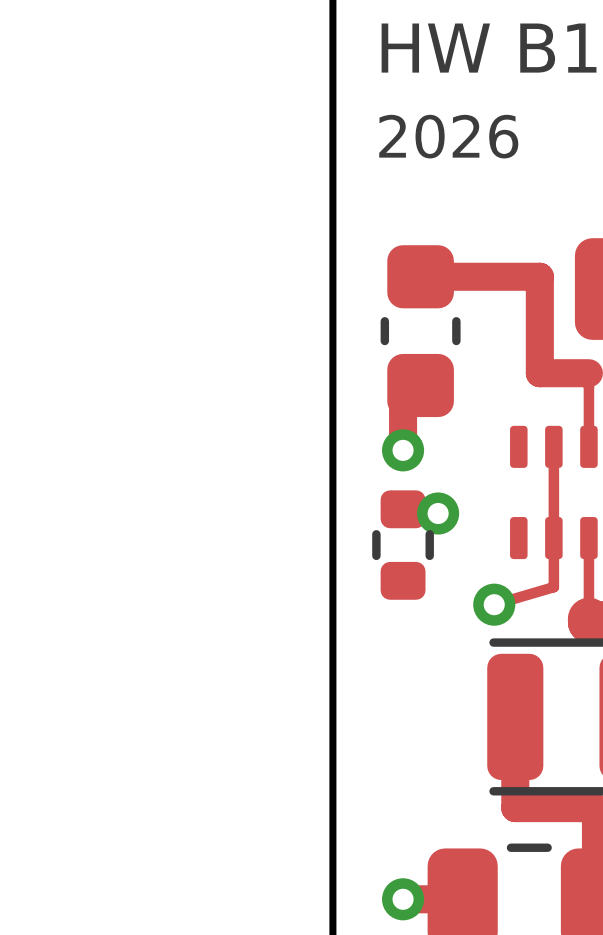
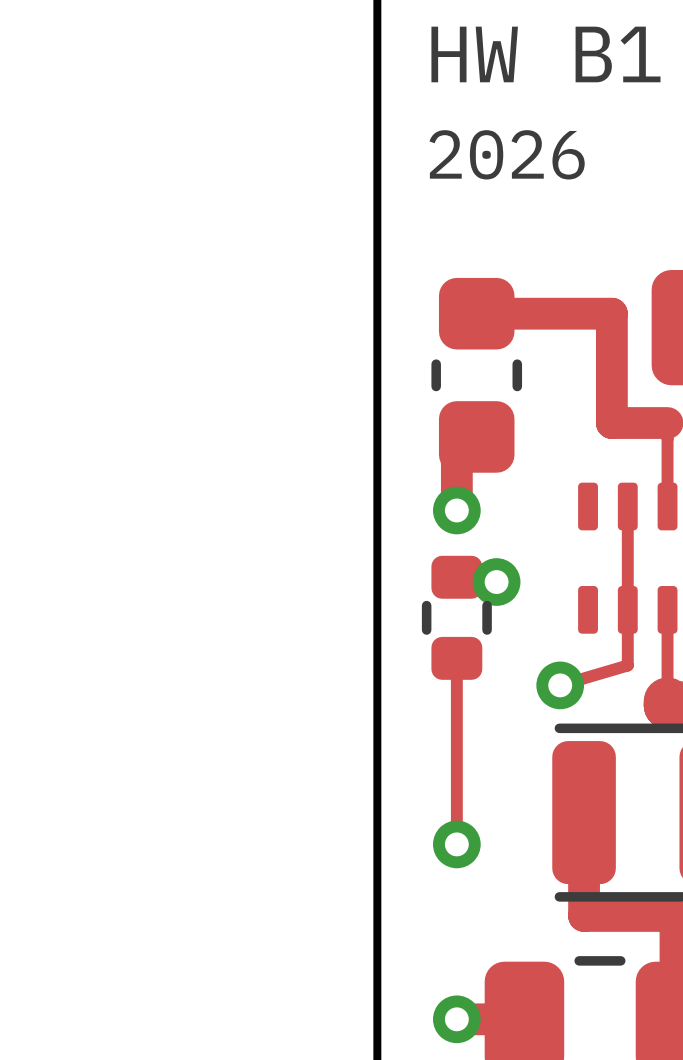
track: none -> (456, 661) (456, 844)
via: none -> (456, 844)

